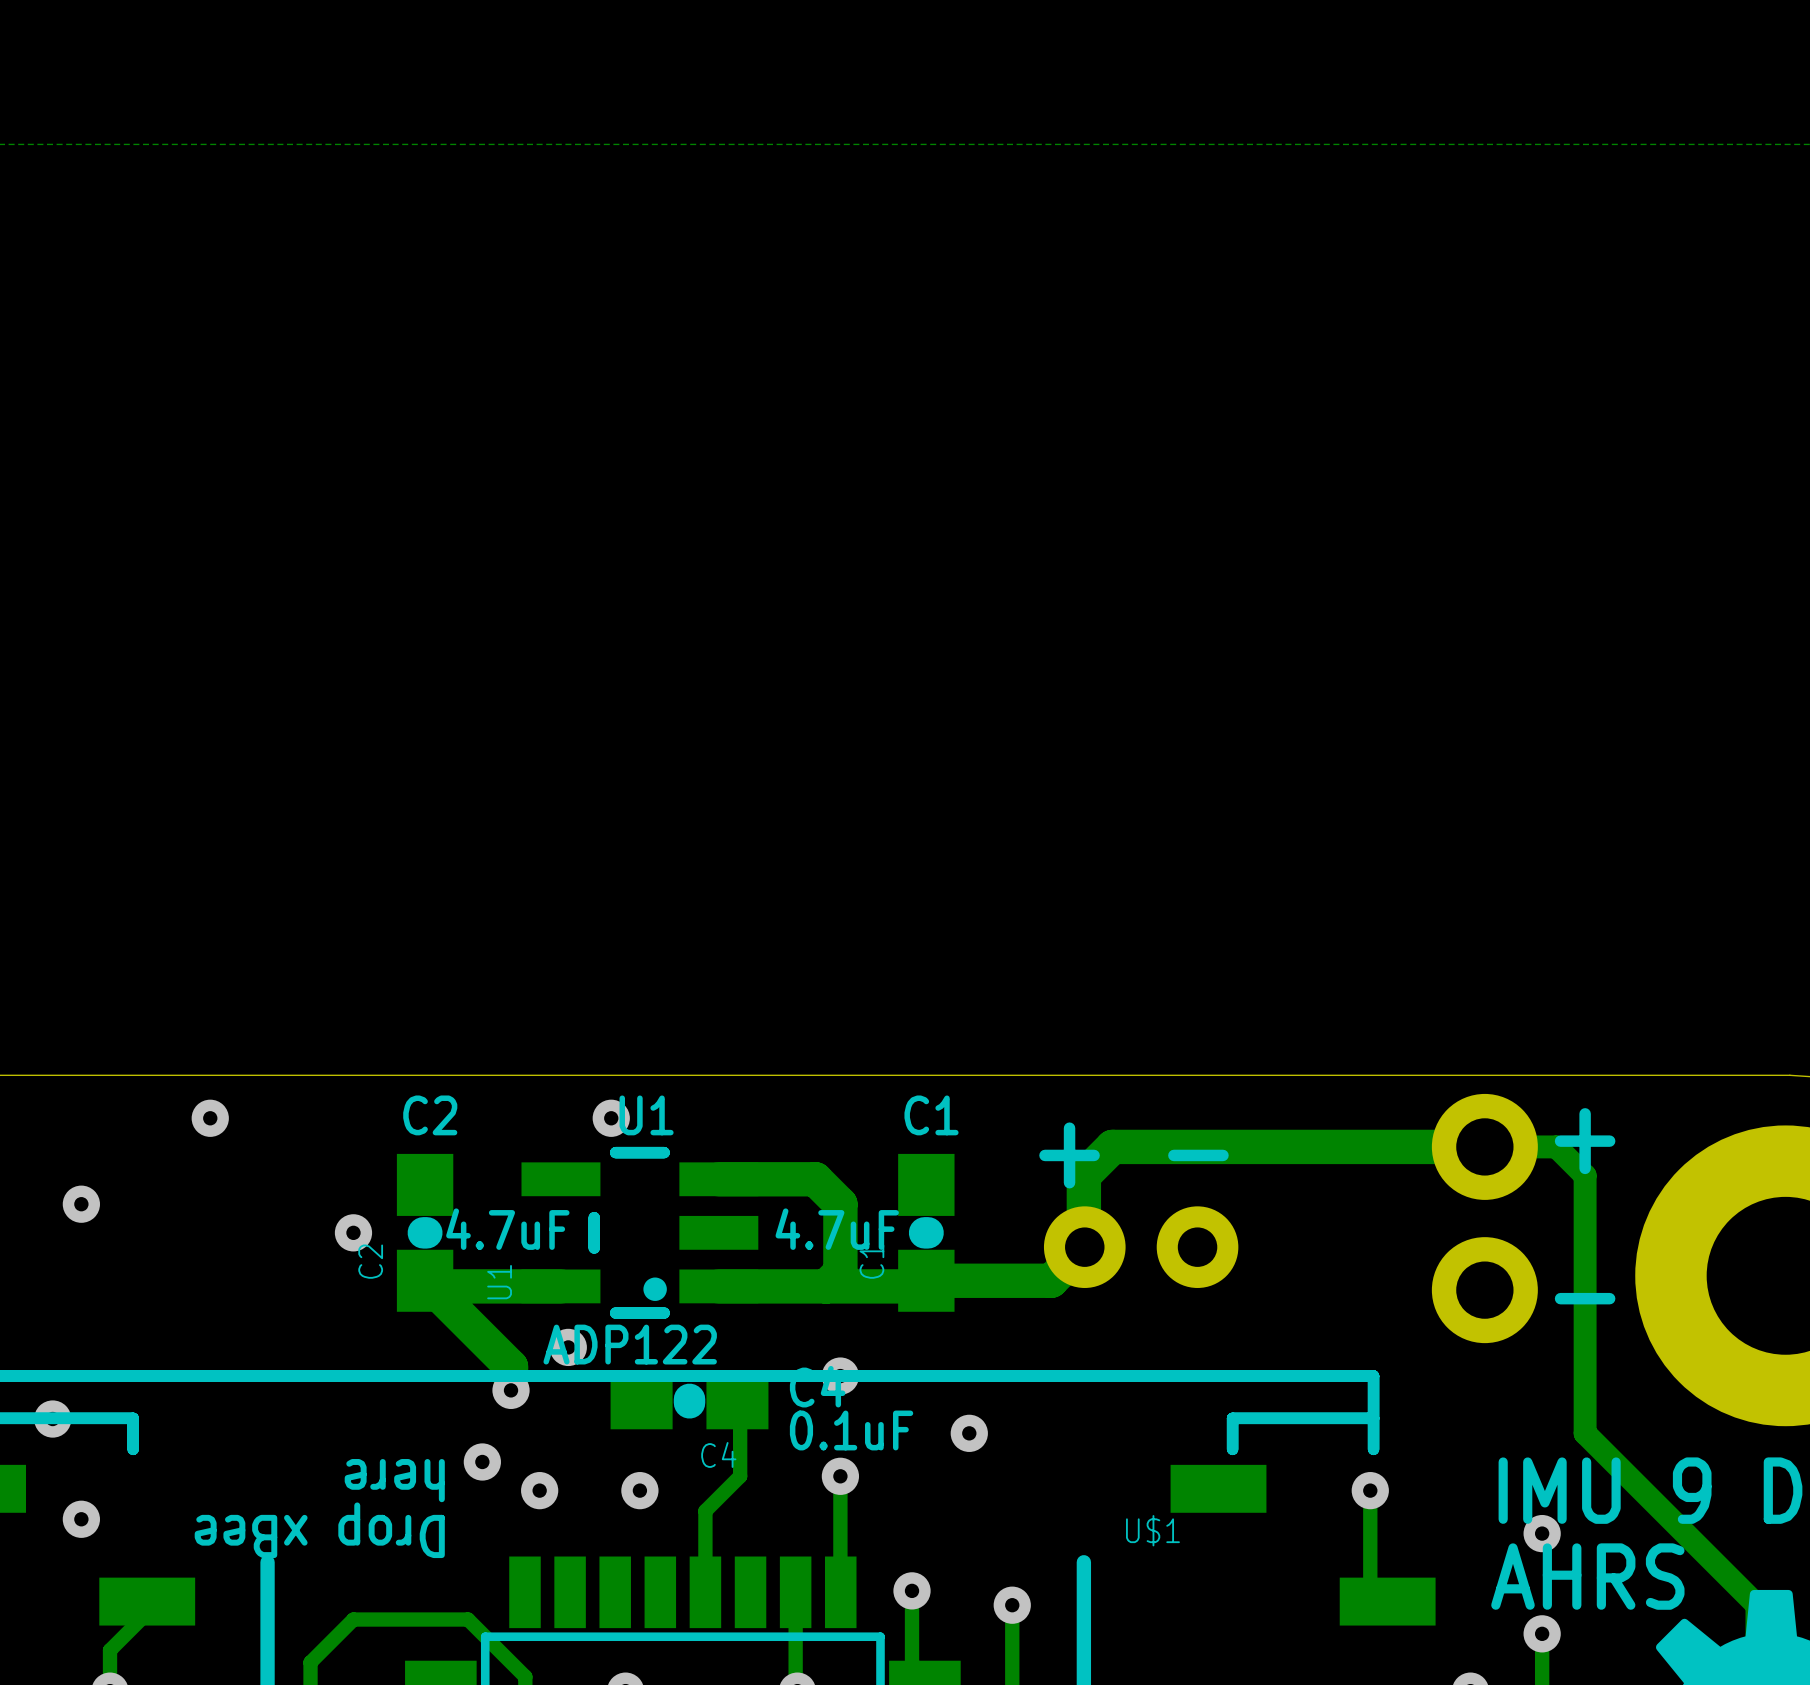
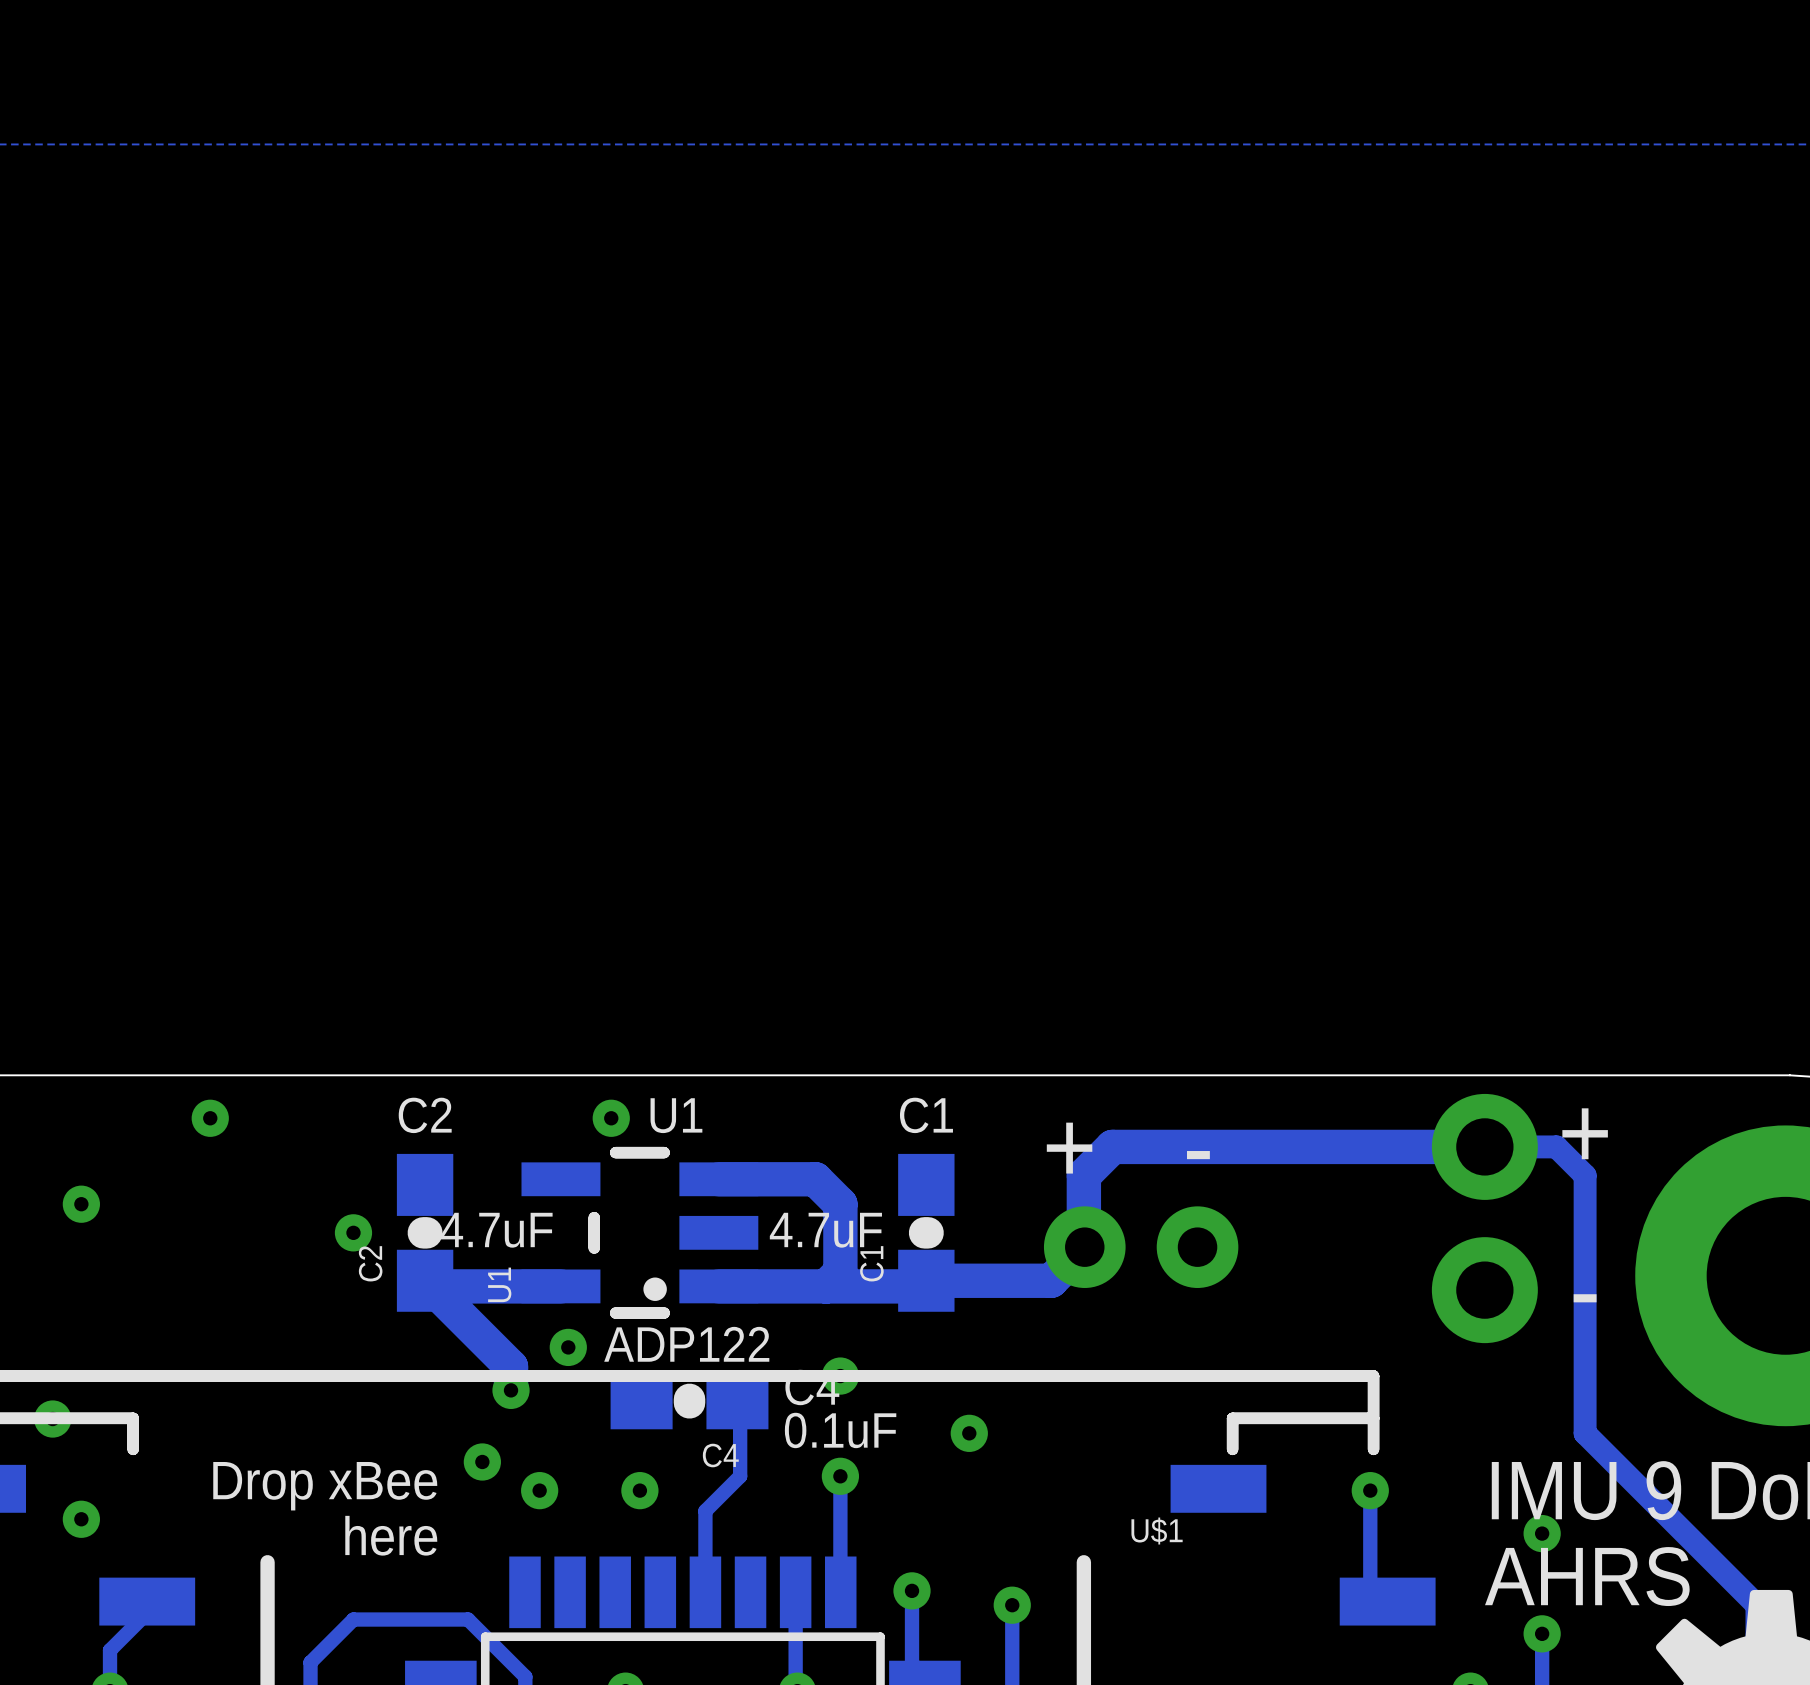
text position: U1 (646, 1115) -> U1 (676, 1115)
text position: ADP122 (630, 1344) -> ADP122 (686, 1344)
text rotation: 0° (394, 1480) -> 180° (391, 1535)
text rotation: 0° (319, 1530) -> 180° (325, 1486)

